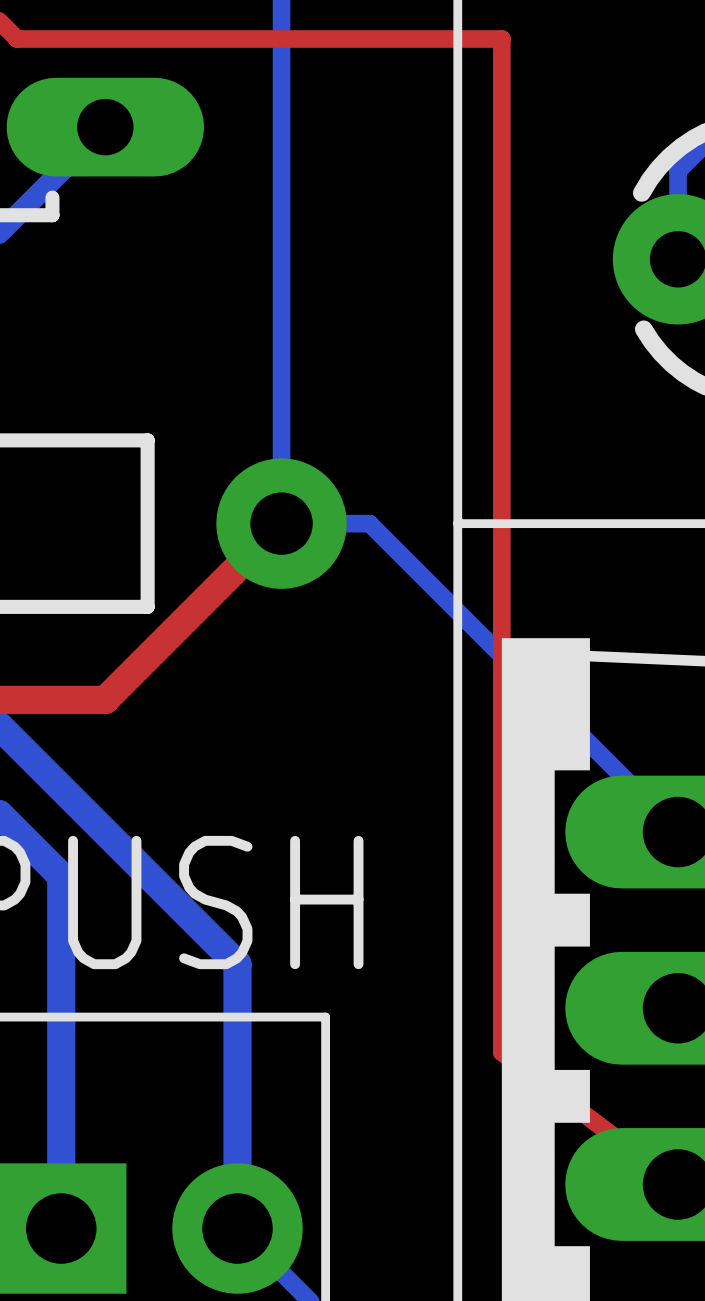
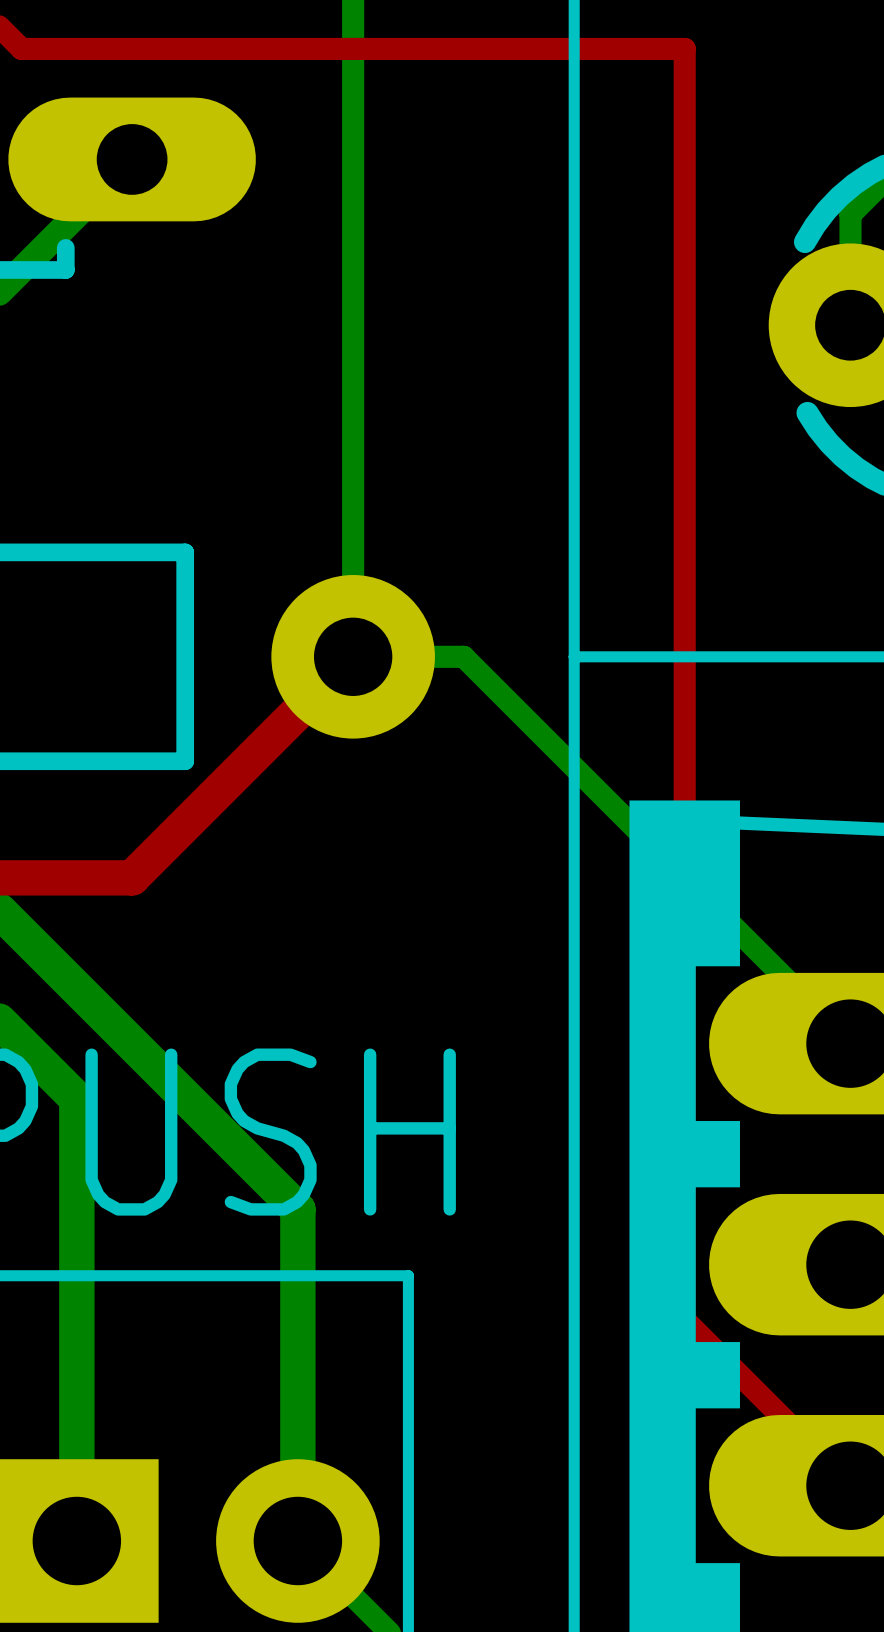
top track: (501, 39) (501, 1052) (678, 1184) -> (629, 48) (684, 48) (684, 1319) (850, 1485)

